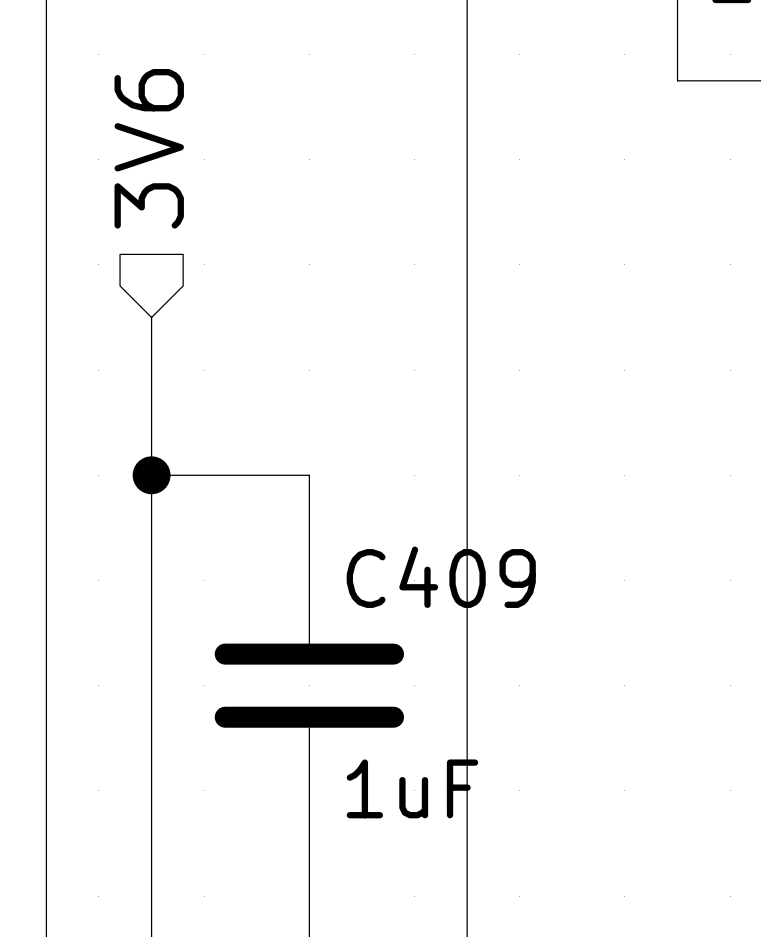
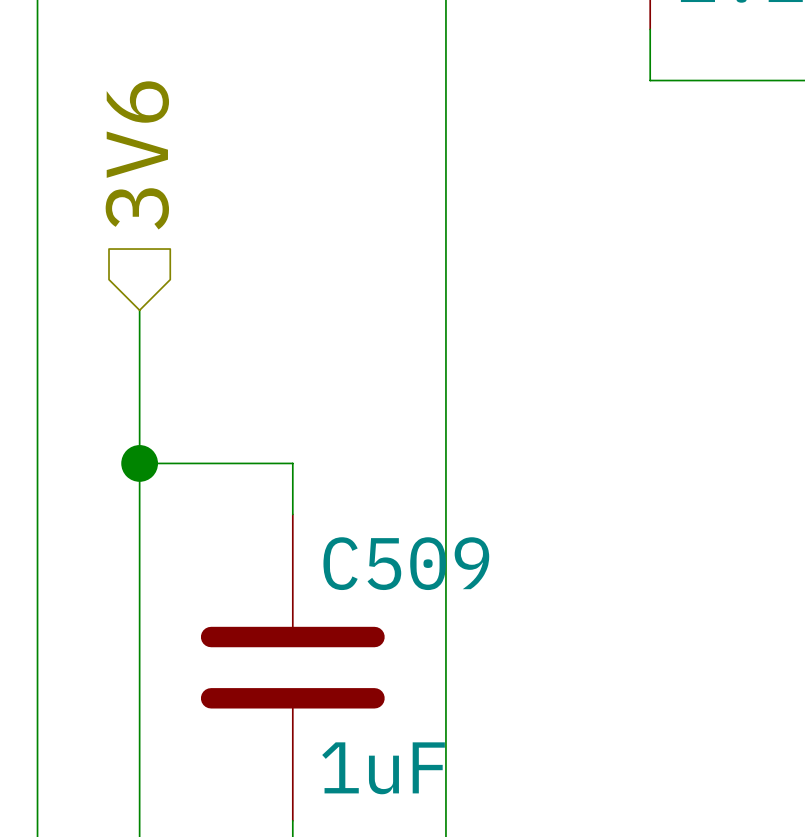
C409 name: C409 (441, 577) -> C509 (406, 563)

